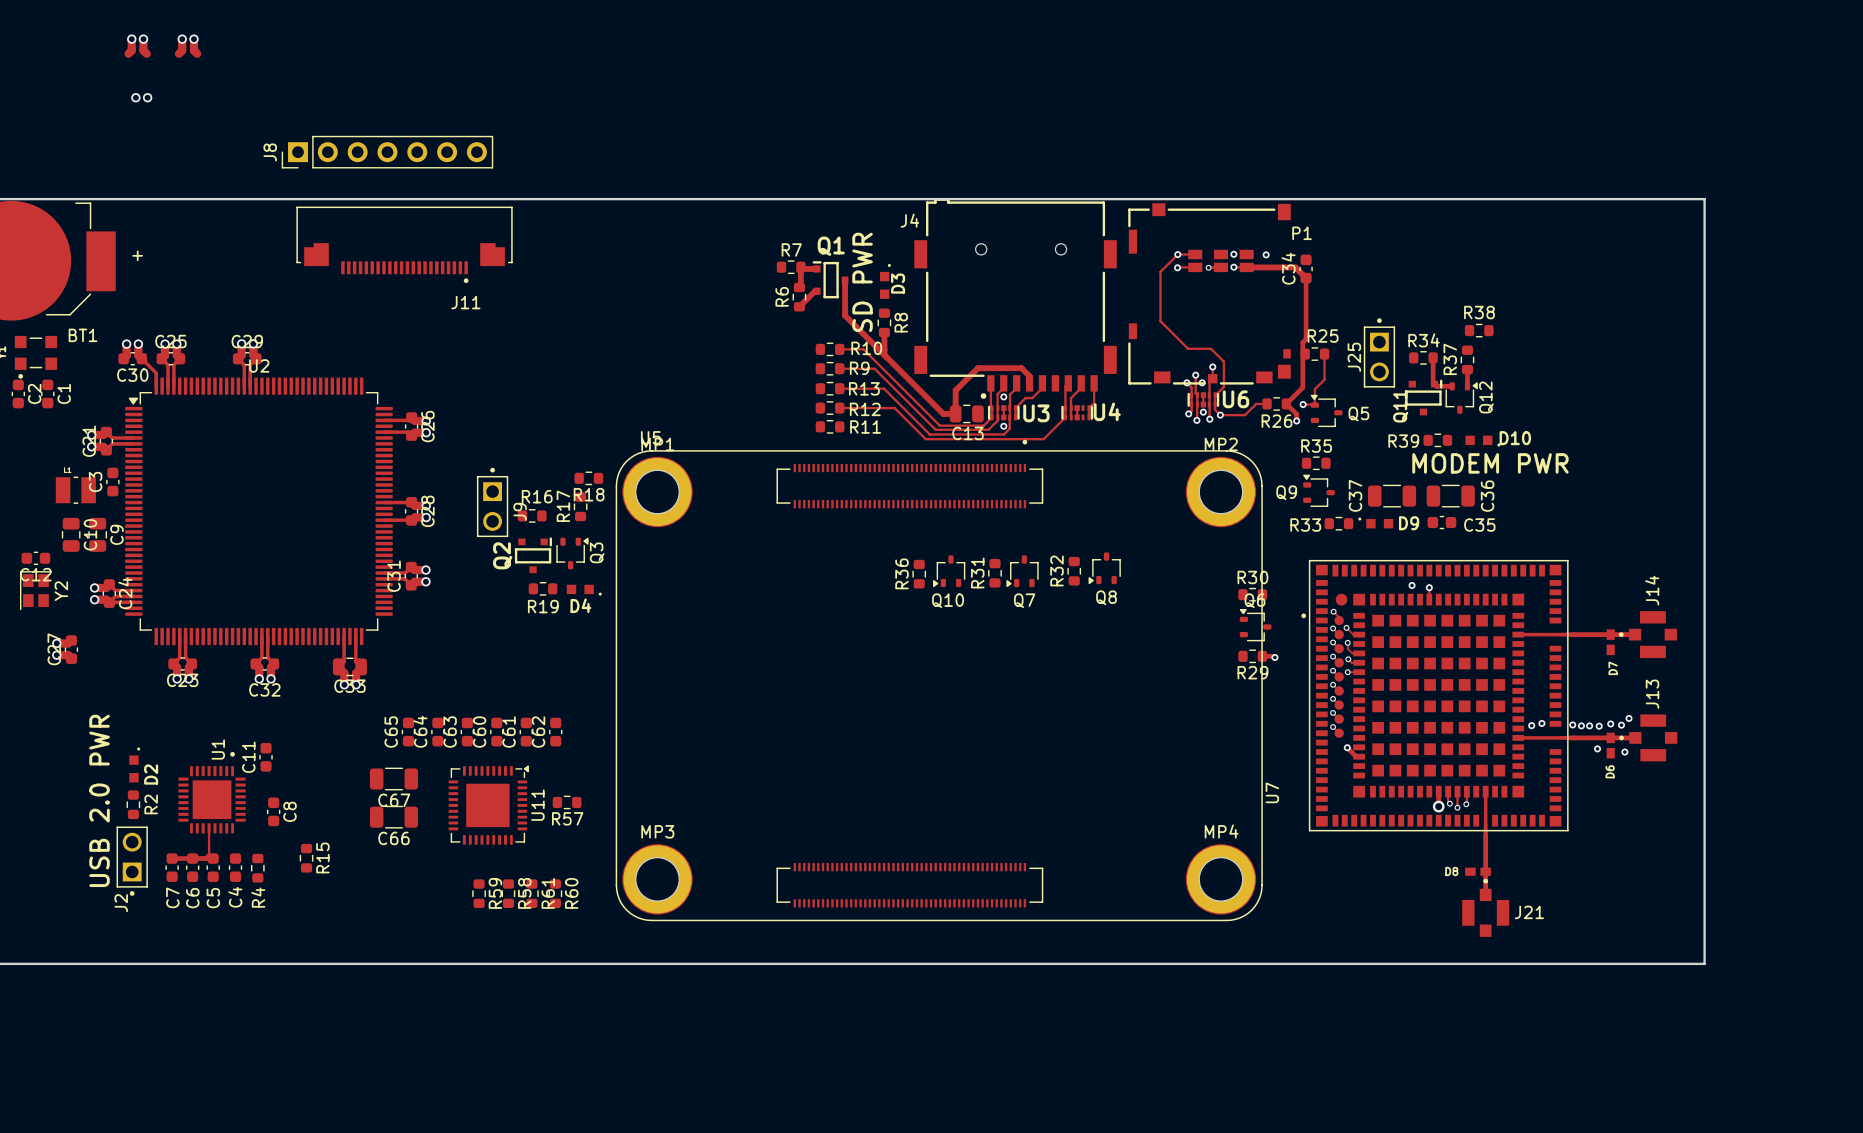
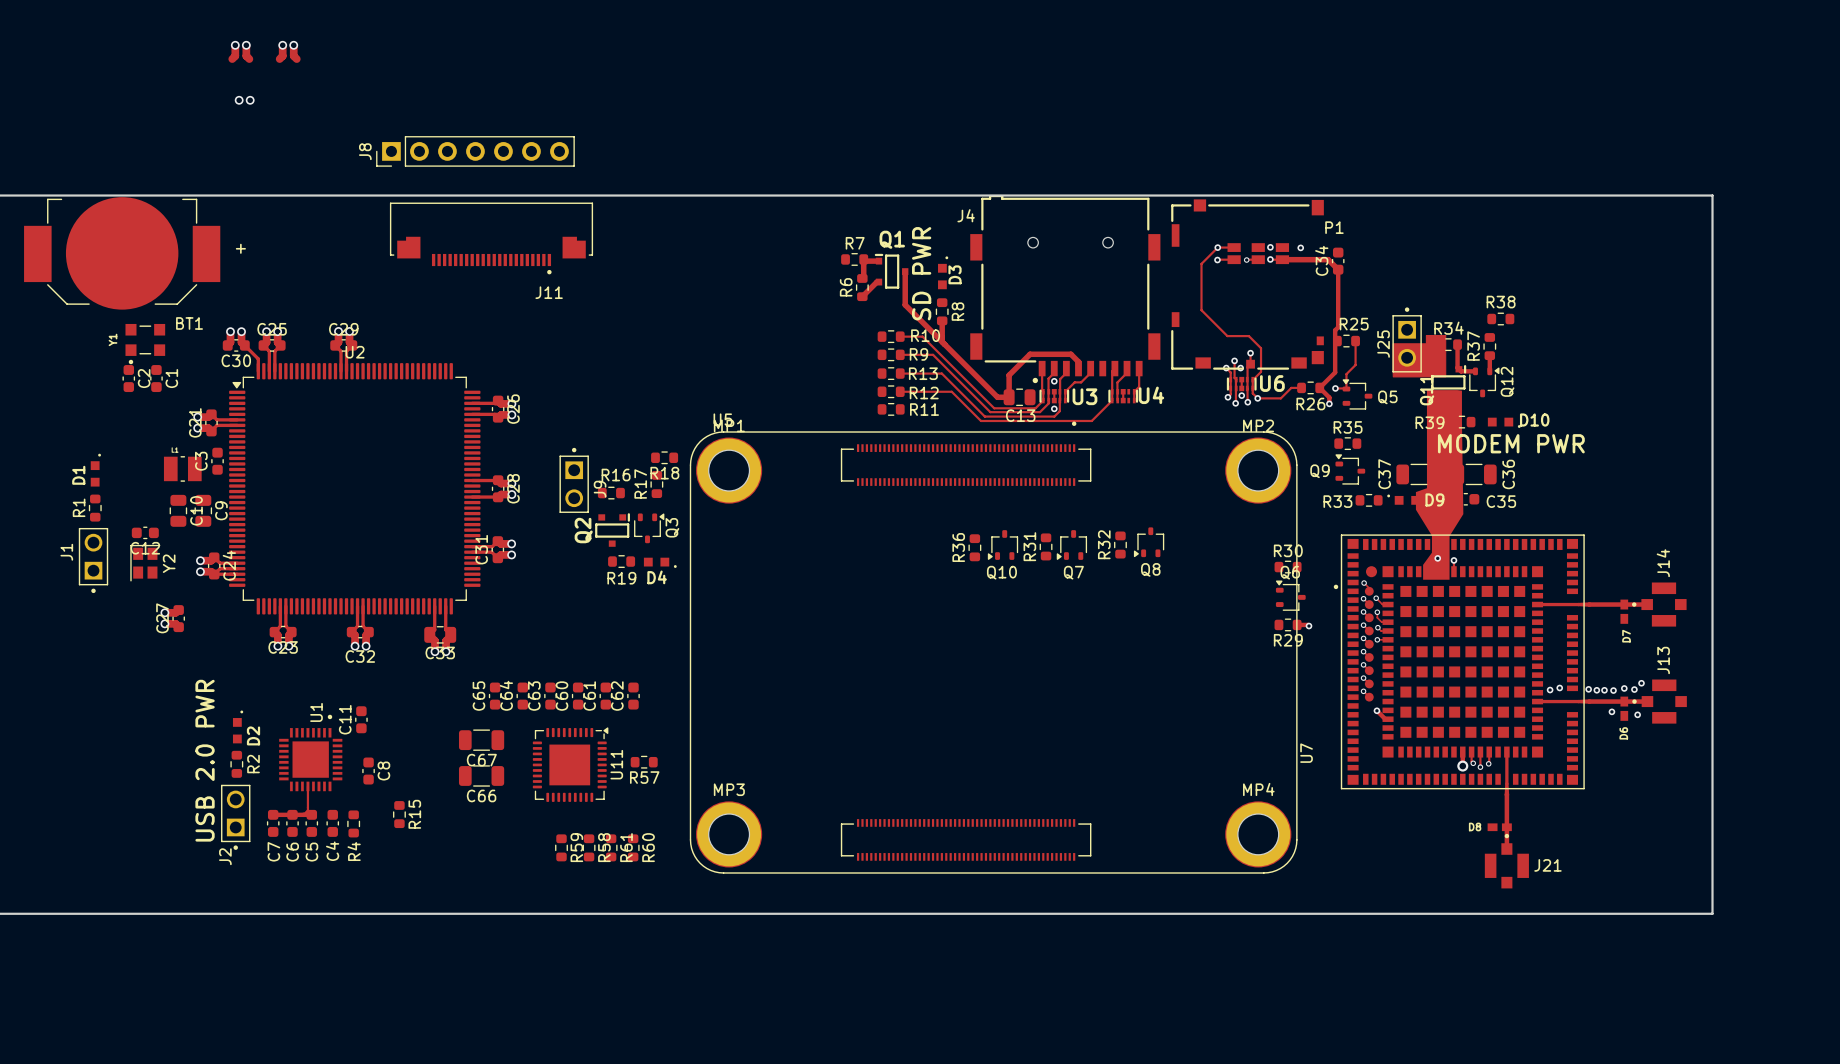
drawing: none -> [1392, 334, 1464, 580]

